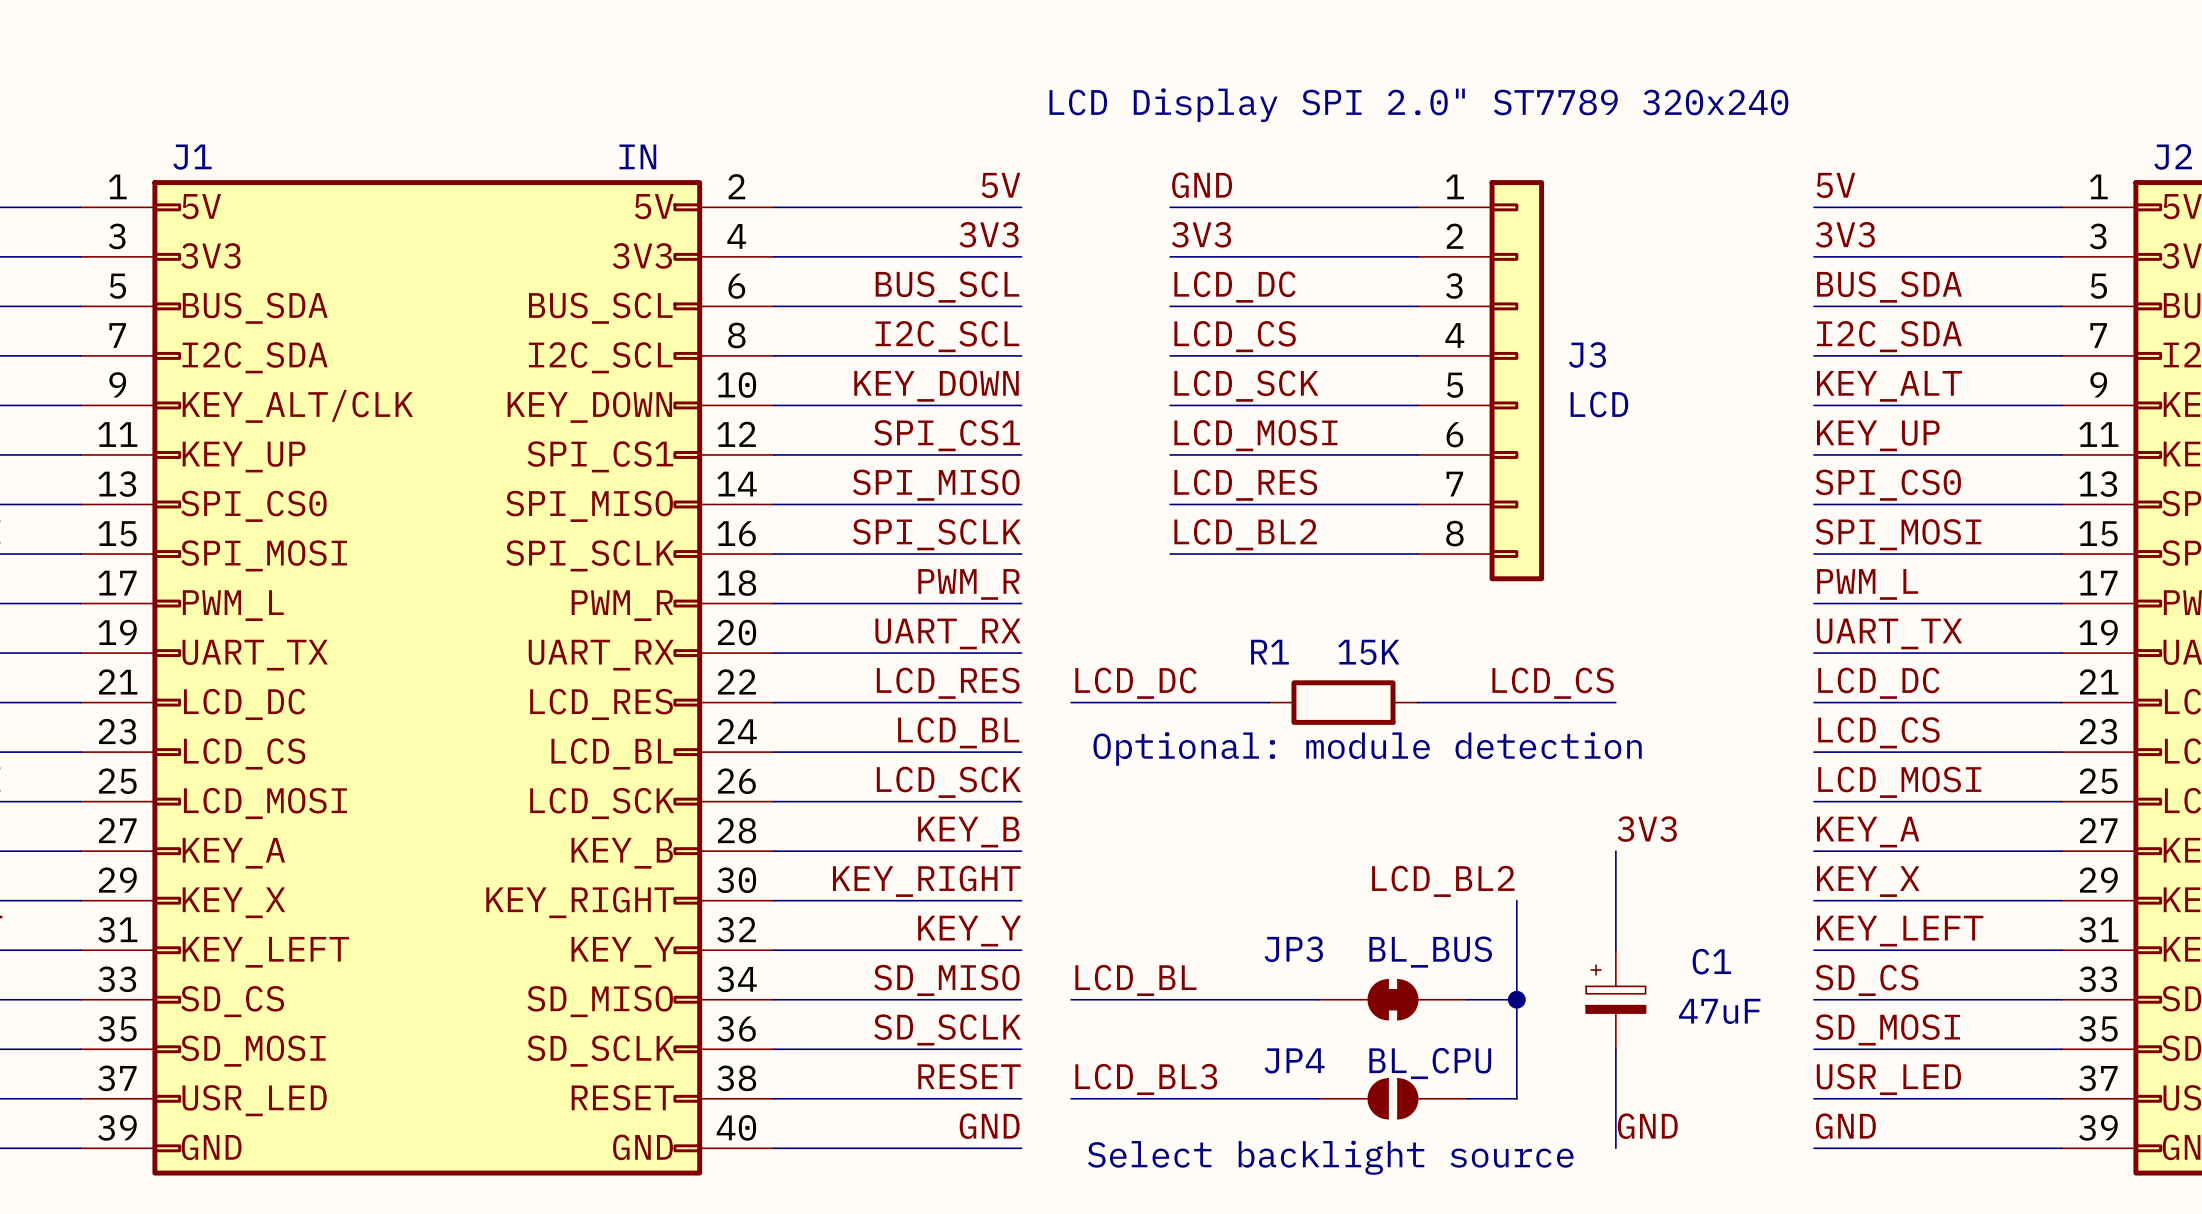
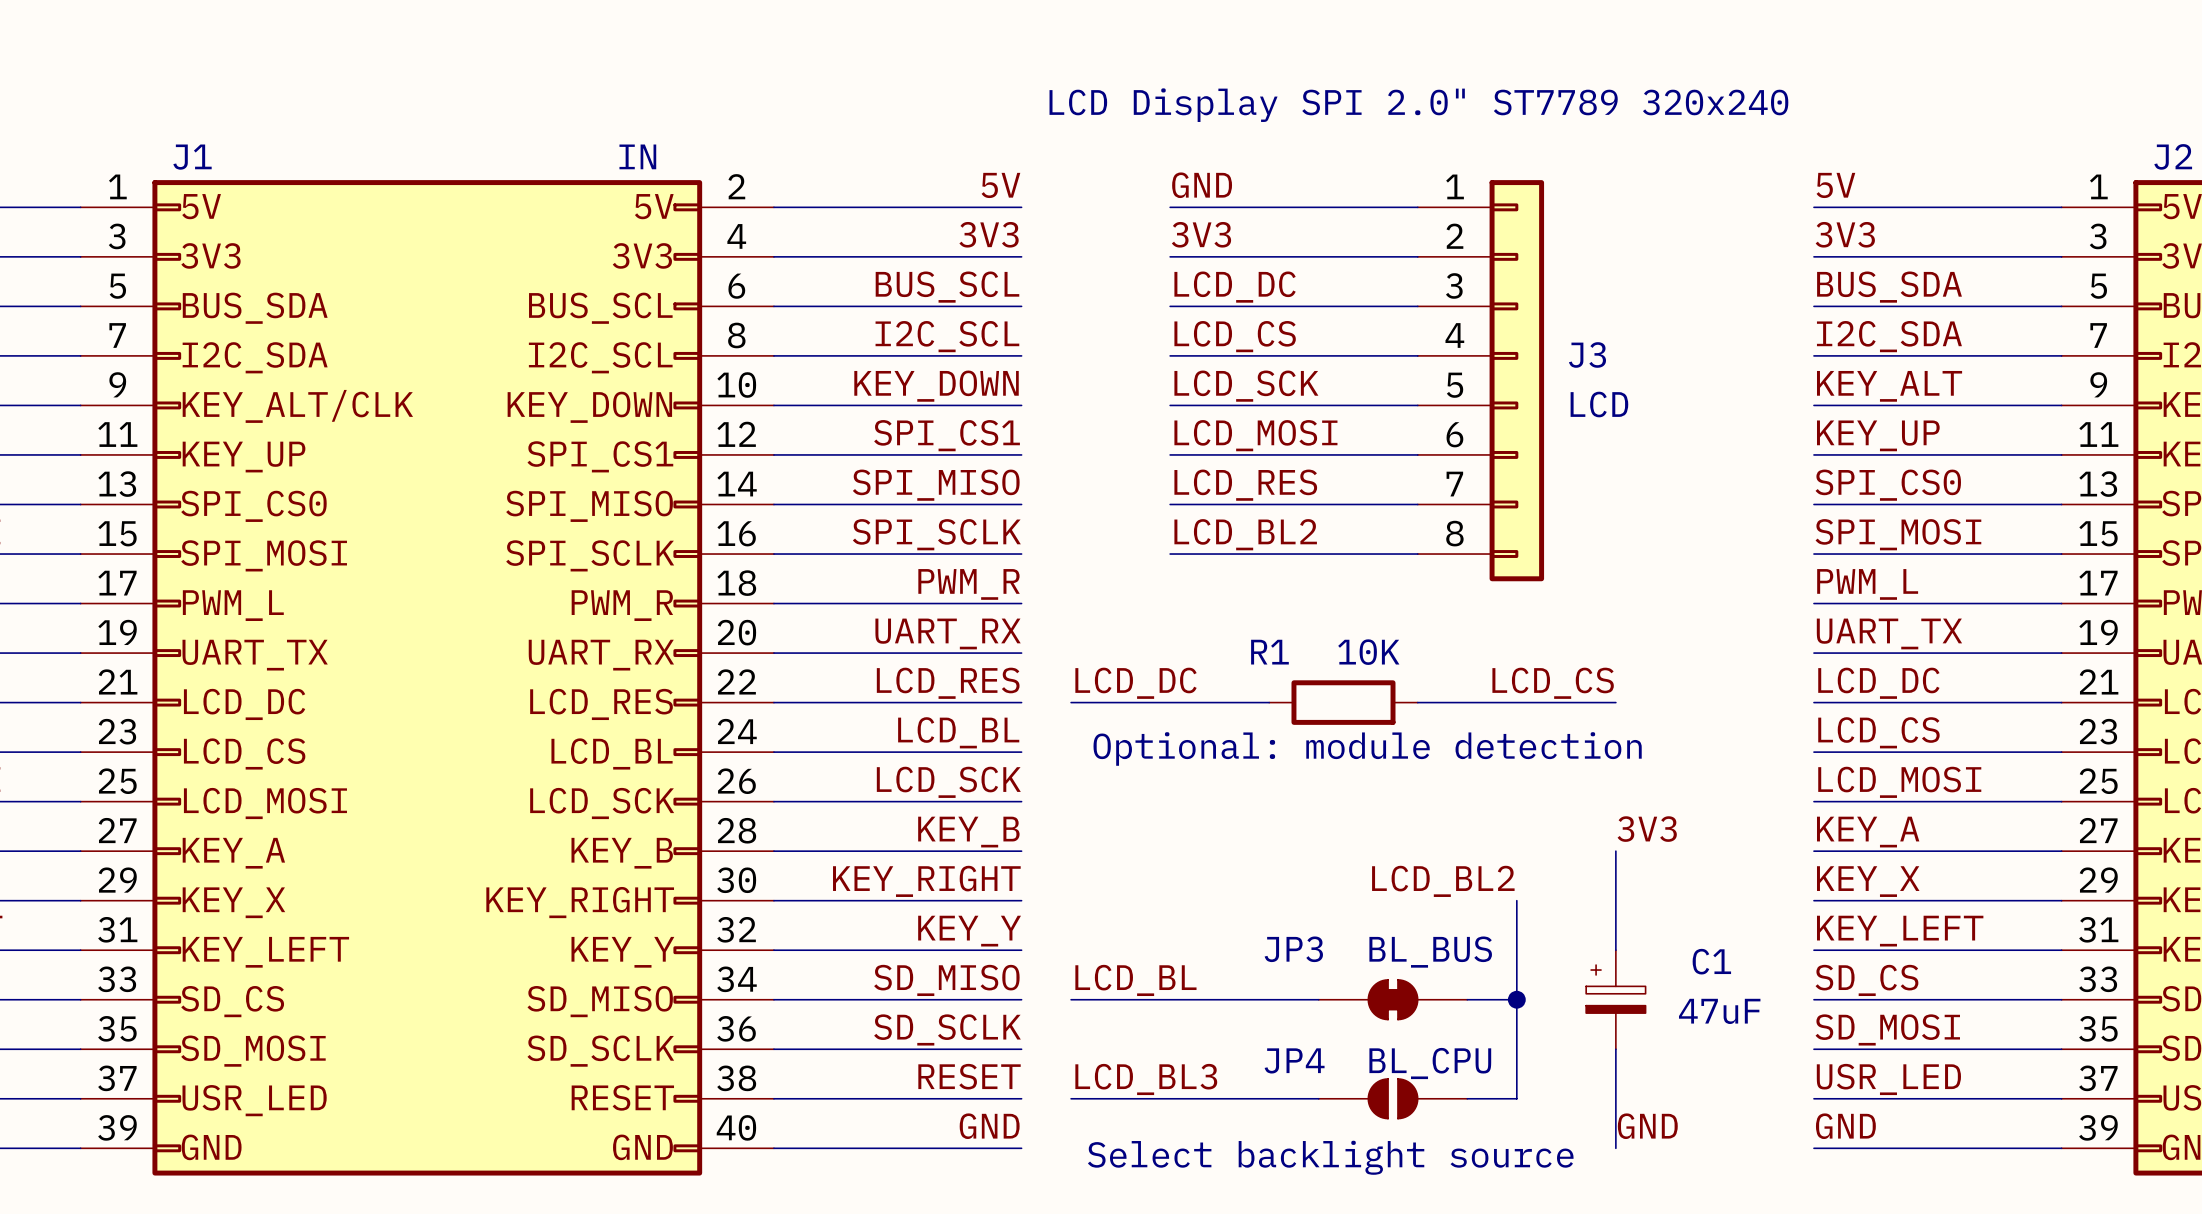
R1 value: 15K (1368, 652) -> 10K (1368, 652)

